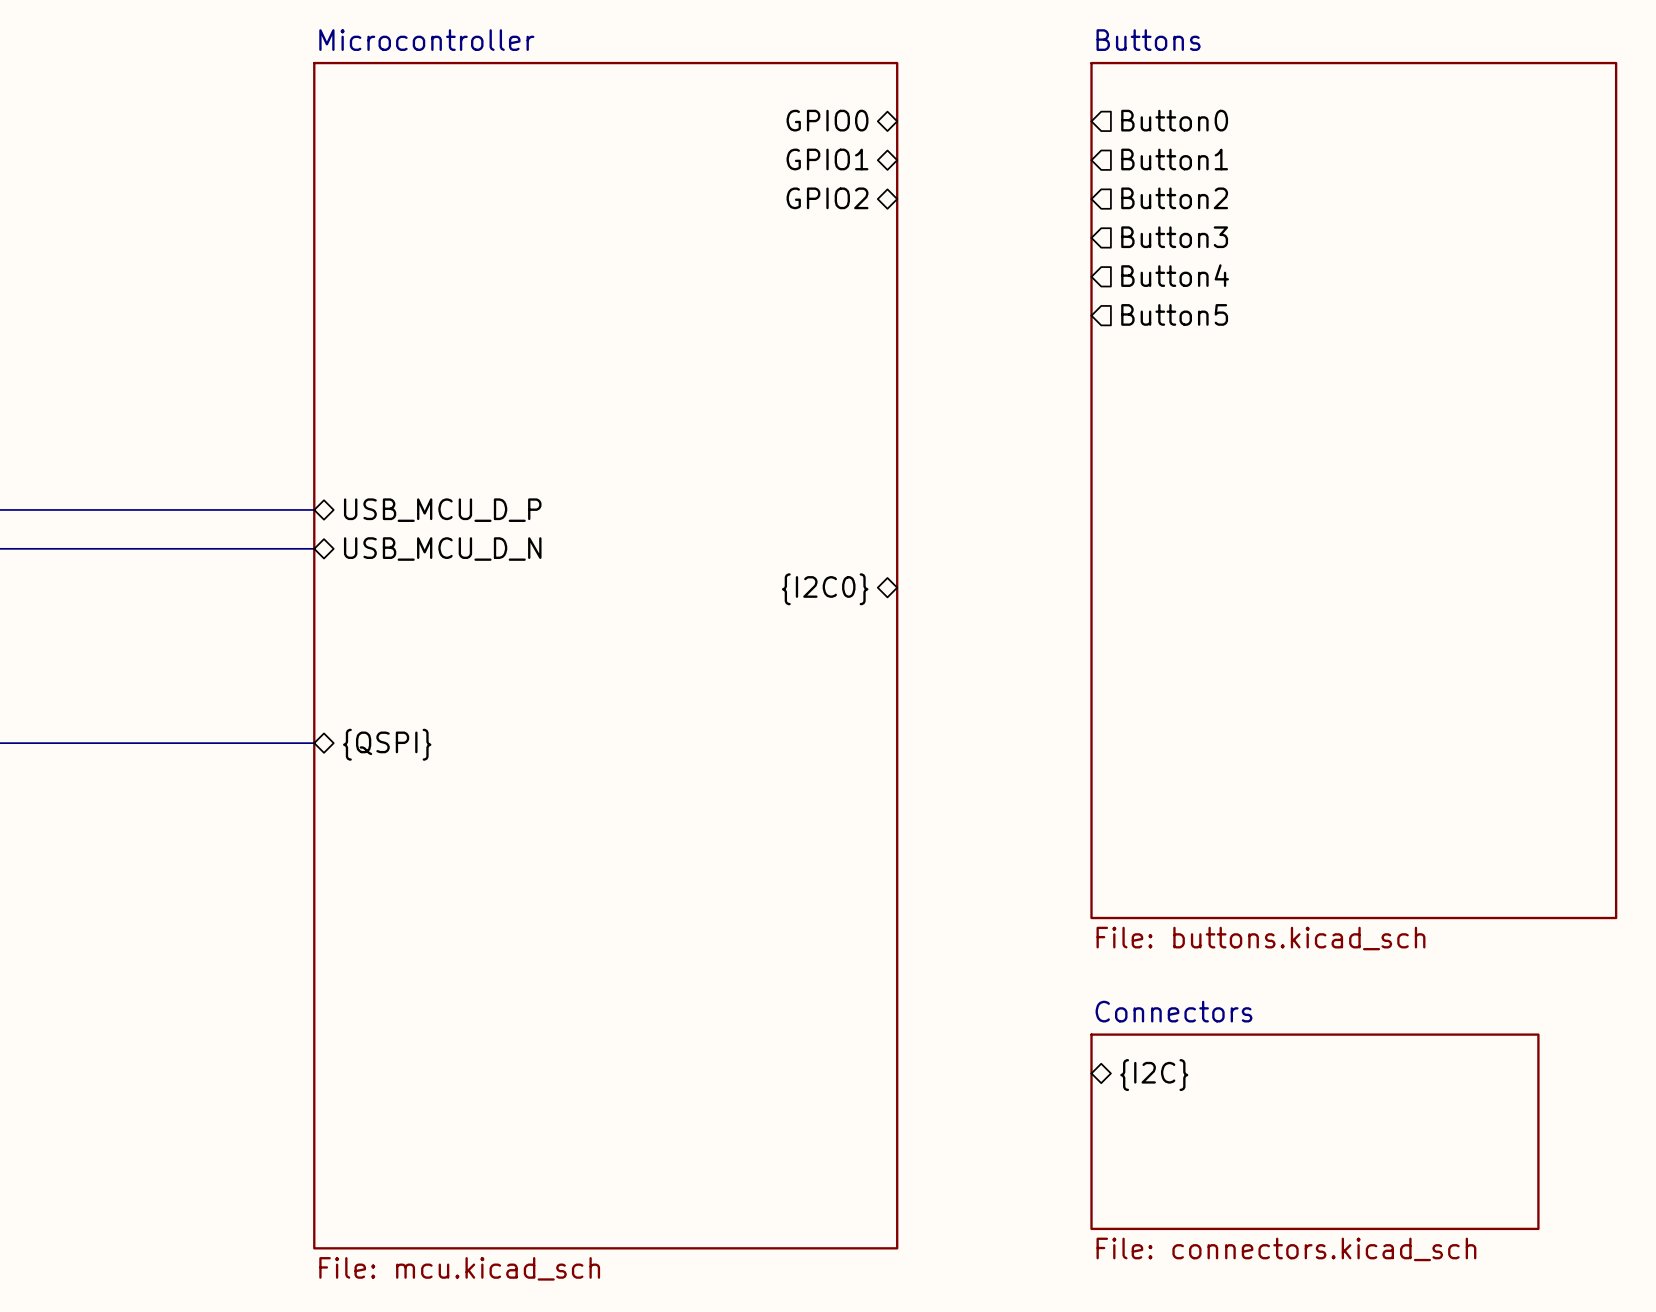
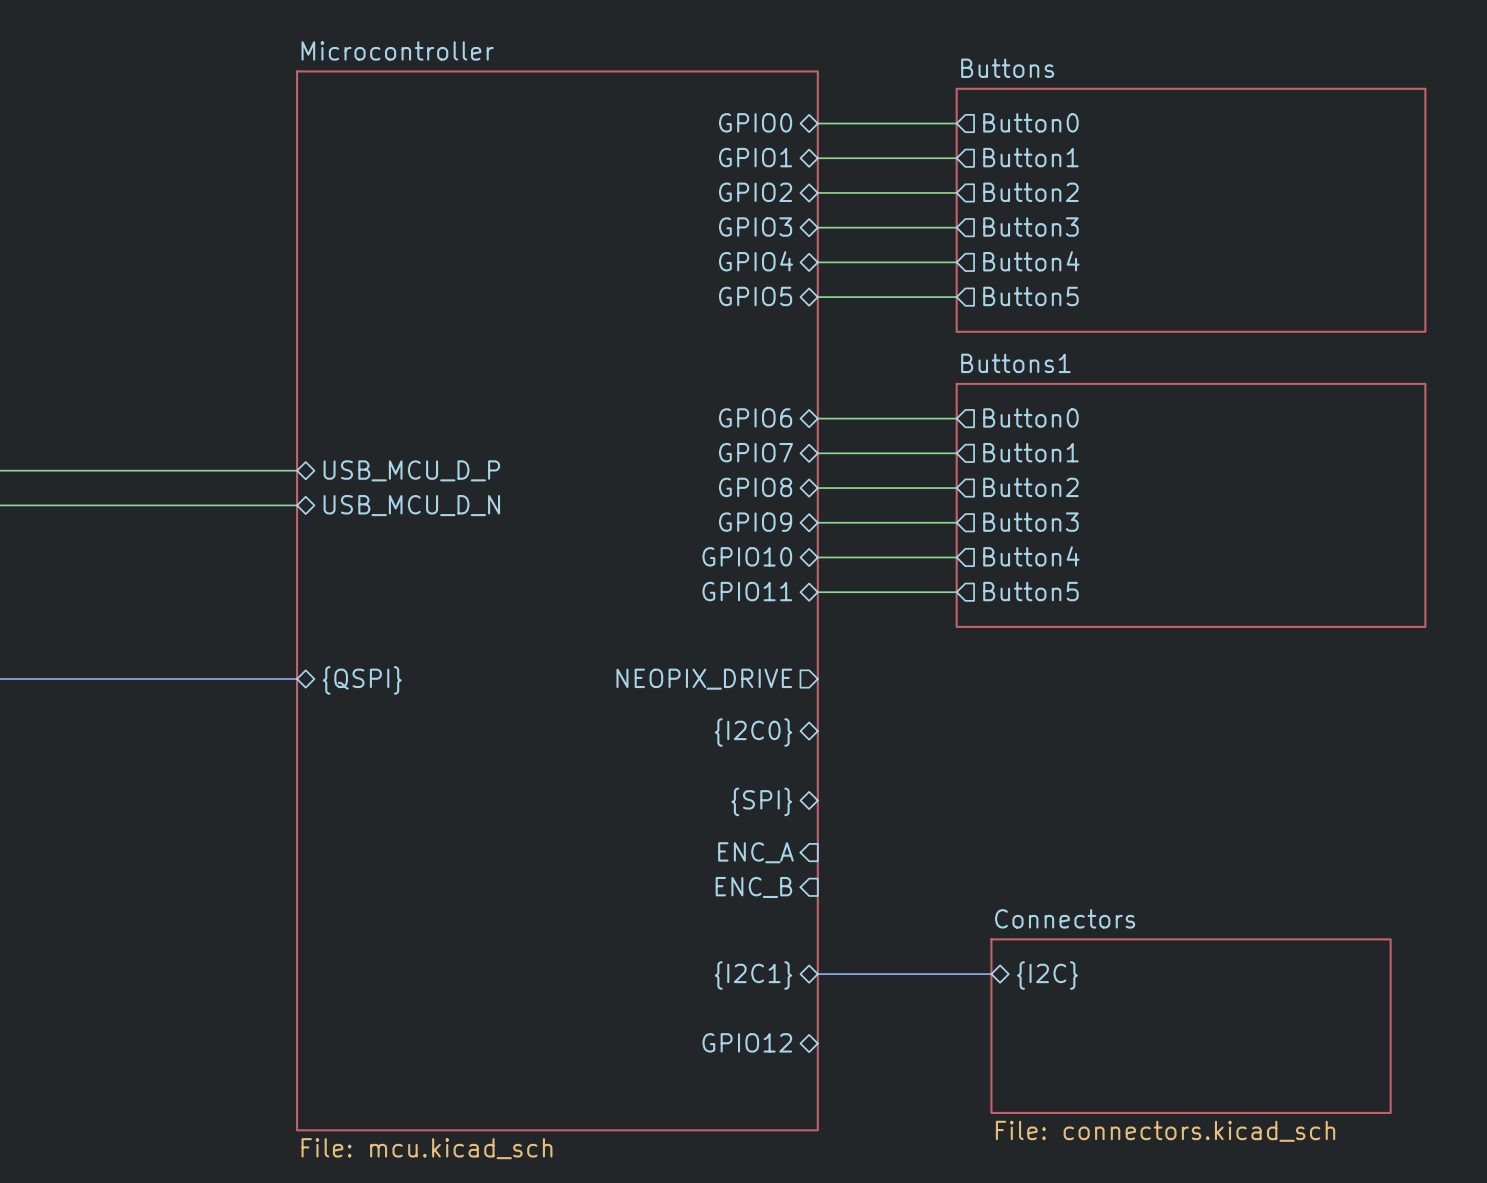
sheet pin position: Button0 (1174, 120) -> Button0 (1030, 122)
wire: none -> (817, 123) (956, 123)
sheet pin position: Button1 (1174, 159) -> Button1 (1030, 157)
wire: none -> (817, 158) (956, 158)
sheet pin position: Button2 (1174, 198) -> Button2 (1030, 192)
wire: none -> (817, 192) (956, 192)
sheet Buttons: none -> (1191, 210)
sheet pin: none -> GPIO3 (755, 227)
wire: none -> (817, 227) (956, 227)
sheet pin position: Button3 (1174, 237) -> Button3 (1030, 227)
sheet pin: none -> GPIO4 (755, 261)
sheet pin position: Button4 (1175, 275) -> Button4 (1031, 261)
wire: none -> (817, 262) (956, 262)
sheet pin: none -> GPIO5 (755, 296)
sheet pin position: Button5 (1174, 314) -> Button5 (1030, 296)
wire: none -> (817, 297) (956, 297)
sheet pin: none -> GPIO6 (755, 417)
sheet pin: none -> Button0 (1030, 417)
wire: none -> (817, 418) (956, 418)
sheet pin: none -> GPIO7 (755, 452)
sheet pin: none -> Button1 (1030, 452)
wire: none -> (817, 453) (956, 453)
sheet Buttons: File: buttons.kicad_sch (1353, 490) -> none
sheet pin: none -> GPIO8 (755, 487)
sheet pin: none -> Button2 (1030, 487)
wire: none -> (817, 488) (956, 488)
sheet Buttons1: none -> (1191, 505)
sheet pin: none -> GPIO9 (755, 522)
sheet pin: none -> Button3 (1030, 522)
wire: none -> (817, 522) (956, 522)
sheet pin position: {I2C0} (825, 589) -> {I2C0} (753, 732)
sheet pin: none -> Button4 (1031, 556)
sheet pin: none -> GPIO10 (747, 556)
wire: none -> (817, 557) (956, 557)
sheet pin: none -> GPIO11 (747, 591)
wire: none -> (817, 592) (956, 592)
sheet pin: none -> Button5 (1030, 591)
sheet pin: none -> NEOPIX_DRIVE (704, 679)
sheet pin: none -> {SPI} (761, 801)
sheet pin: none -> ENC_A (755, 852)
sheet pin: none -> ENC_B (753, 887)
bus: none -> (817, 974) (991, 974)
sheet pin: none -> {I2C1} (753, 975)
sheet pin: none -> GPIO12 (747, 1042)

